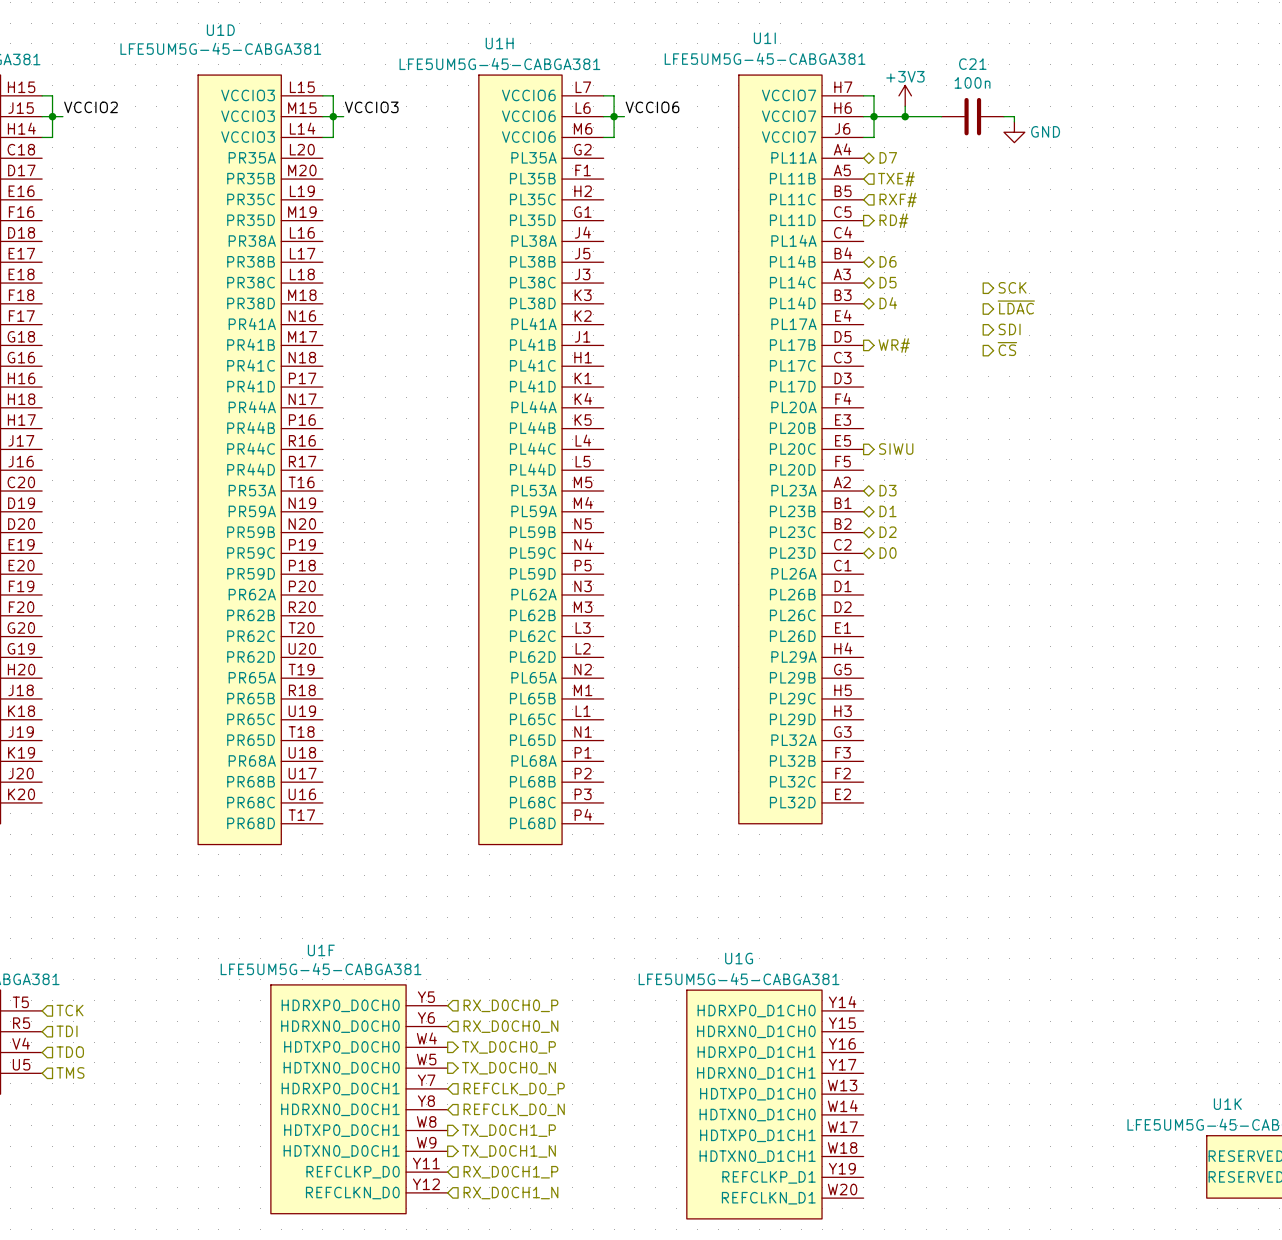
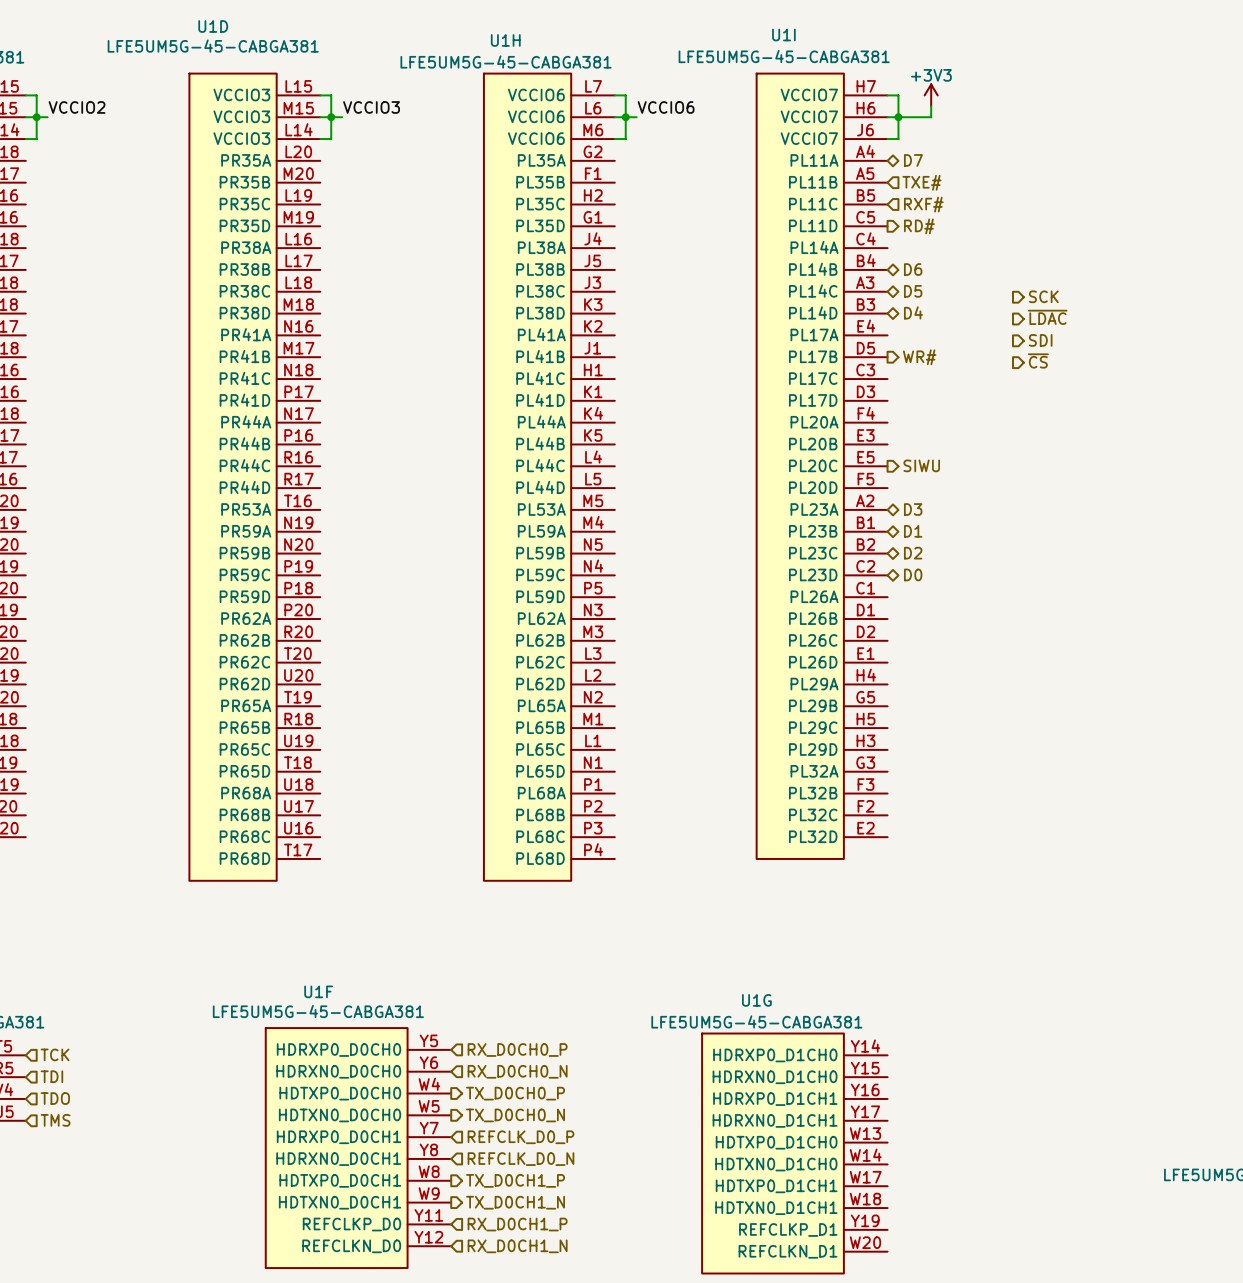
wire: (905, 116) (941, 116) -> none
junction: (905, 116) -> none
C21: 100n (972, 116) -> none
wire: (1003, 116) (1014, 116) (1014, 121) -> none
power symbol: GND (1014, 132) -> none

